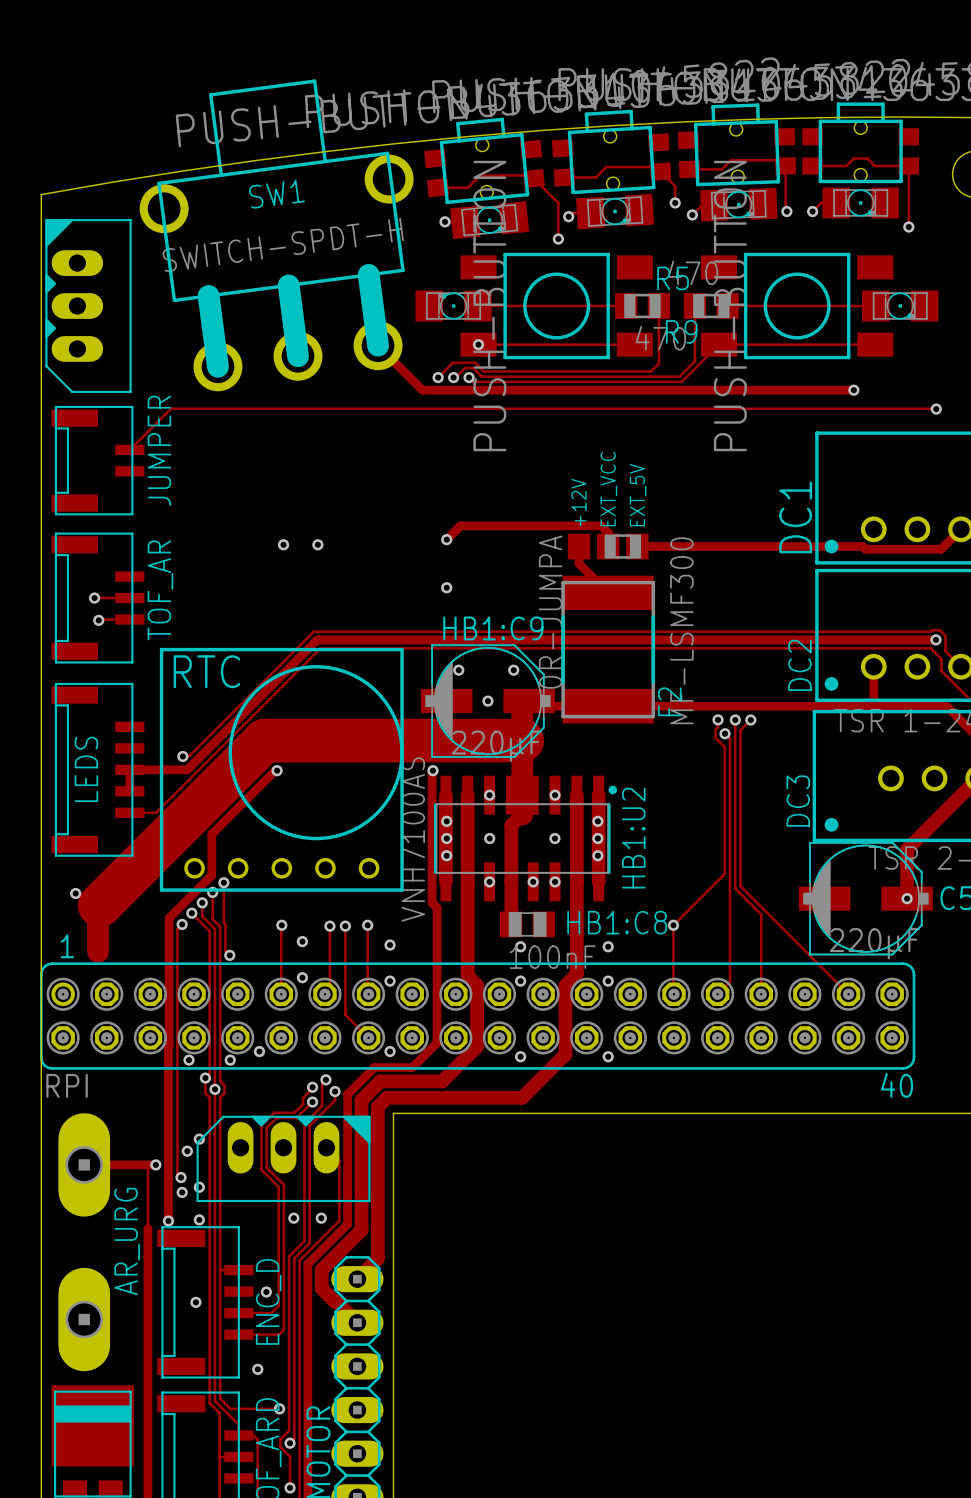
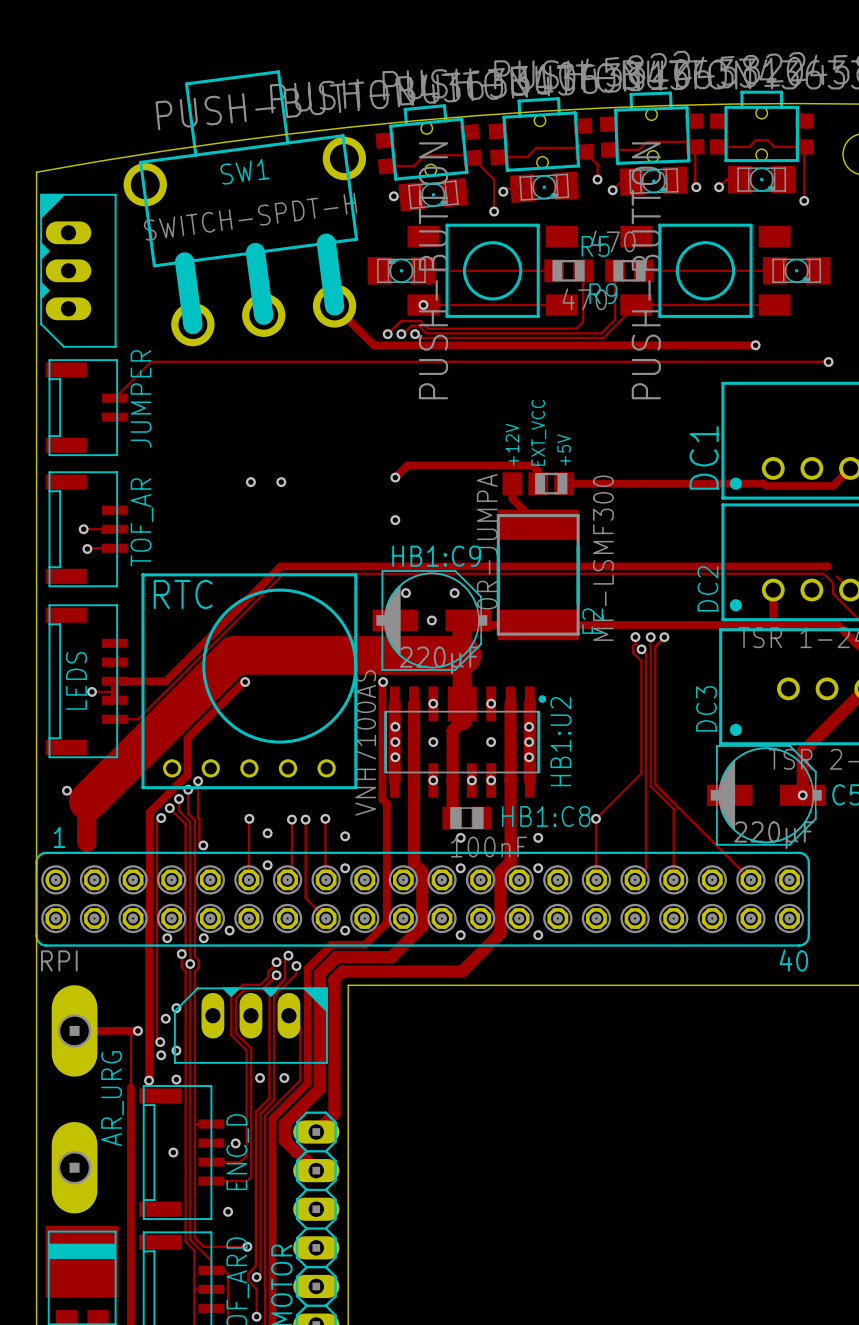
text: EXT_5V (638, 495) -> +5V (564, 450)
via: (935, 639) -> none
track: (945, 651) (945, 635) (939, 630) (313, 631) (188, 756) (182, 756) -> none
via position: (182, 756) -> (92, 691)
track: none -> (92, 691) (114, 691)

